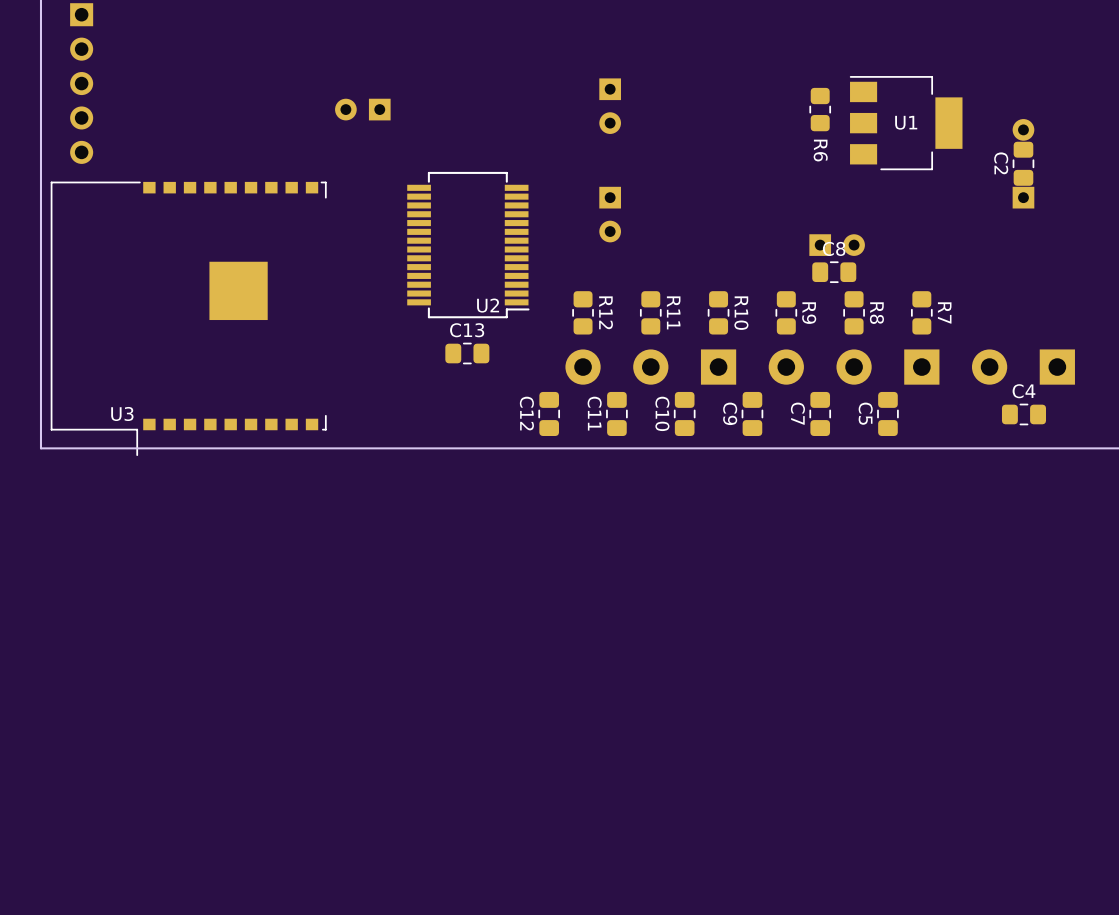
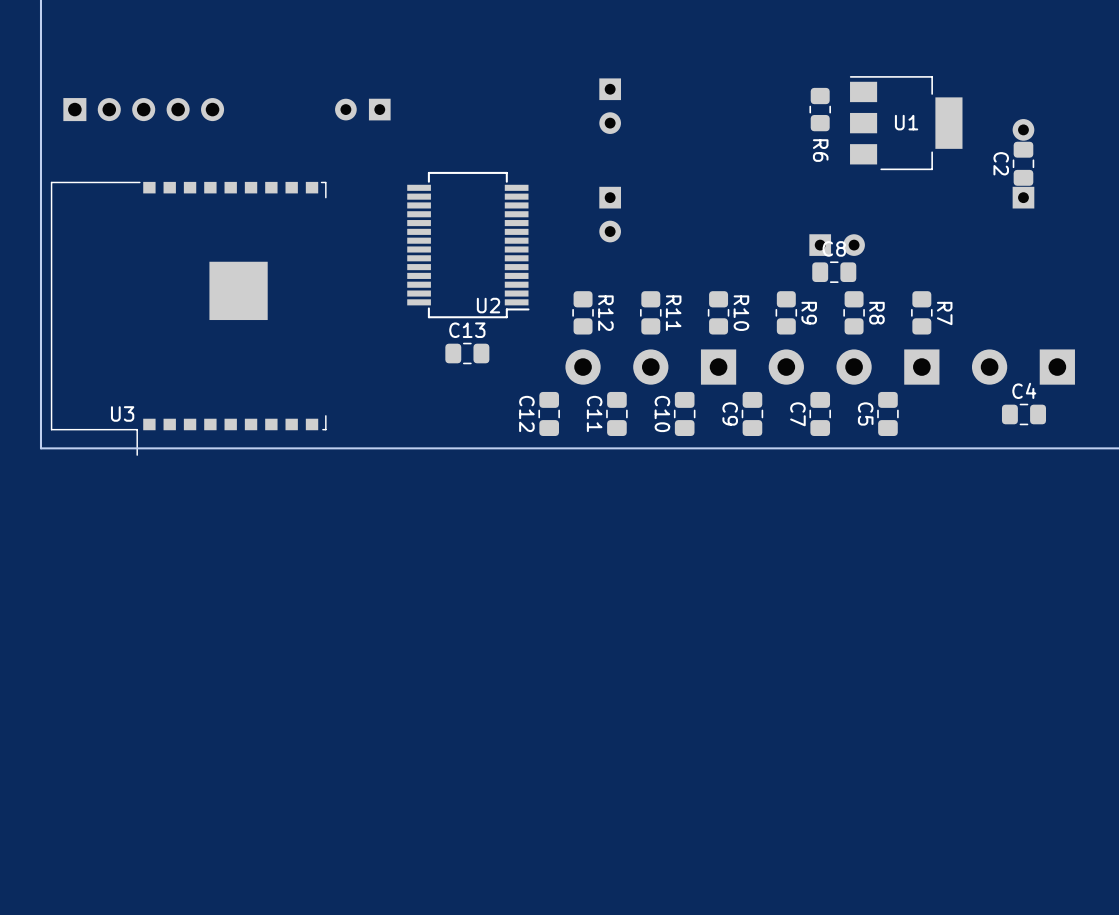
part rotation: 0° (81, 83) -> 90° counterclockwise (143, 109)

